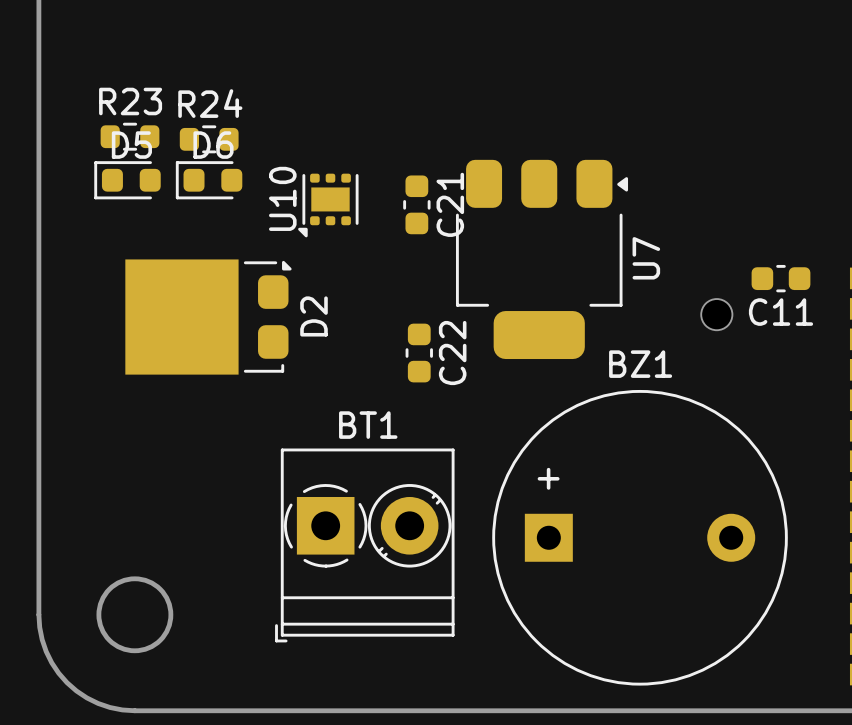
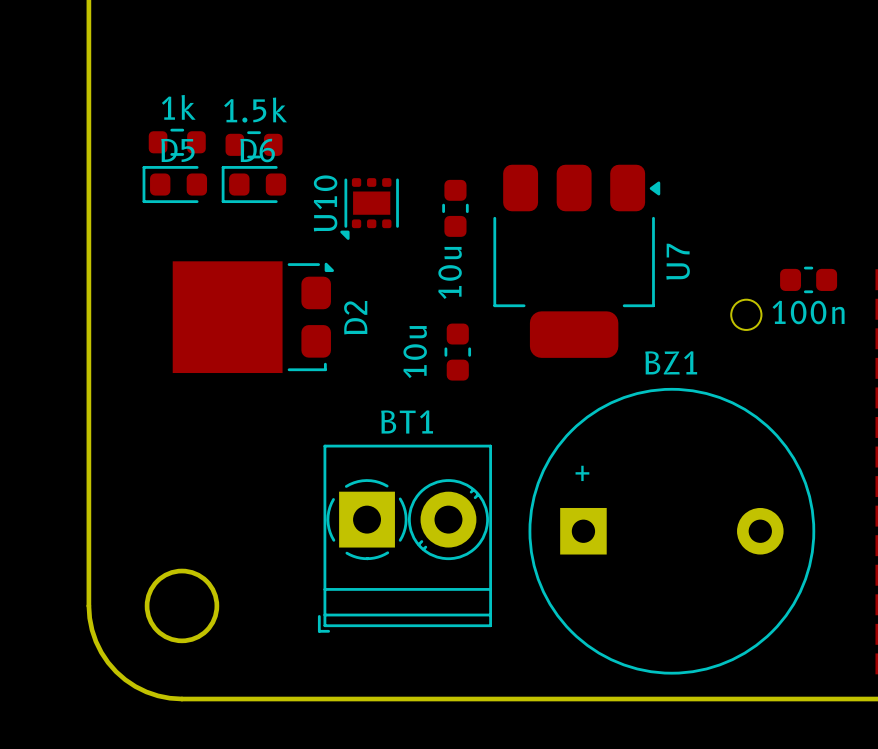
R23 name: R23 (130, 101) -> 1k (178, 107)
R24 name: R24 (210, 103) -> 1.5k (255, 110)
C21 name: C21 (450, 204) -> 10u (450, 272)
C11 name: C11 (780, 312) -> 100n (808, 312)
C22 name: C22 (452, 353) -> 10u (415, 352)

